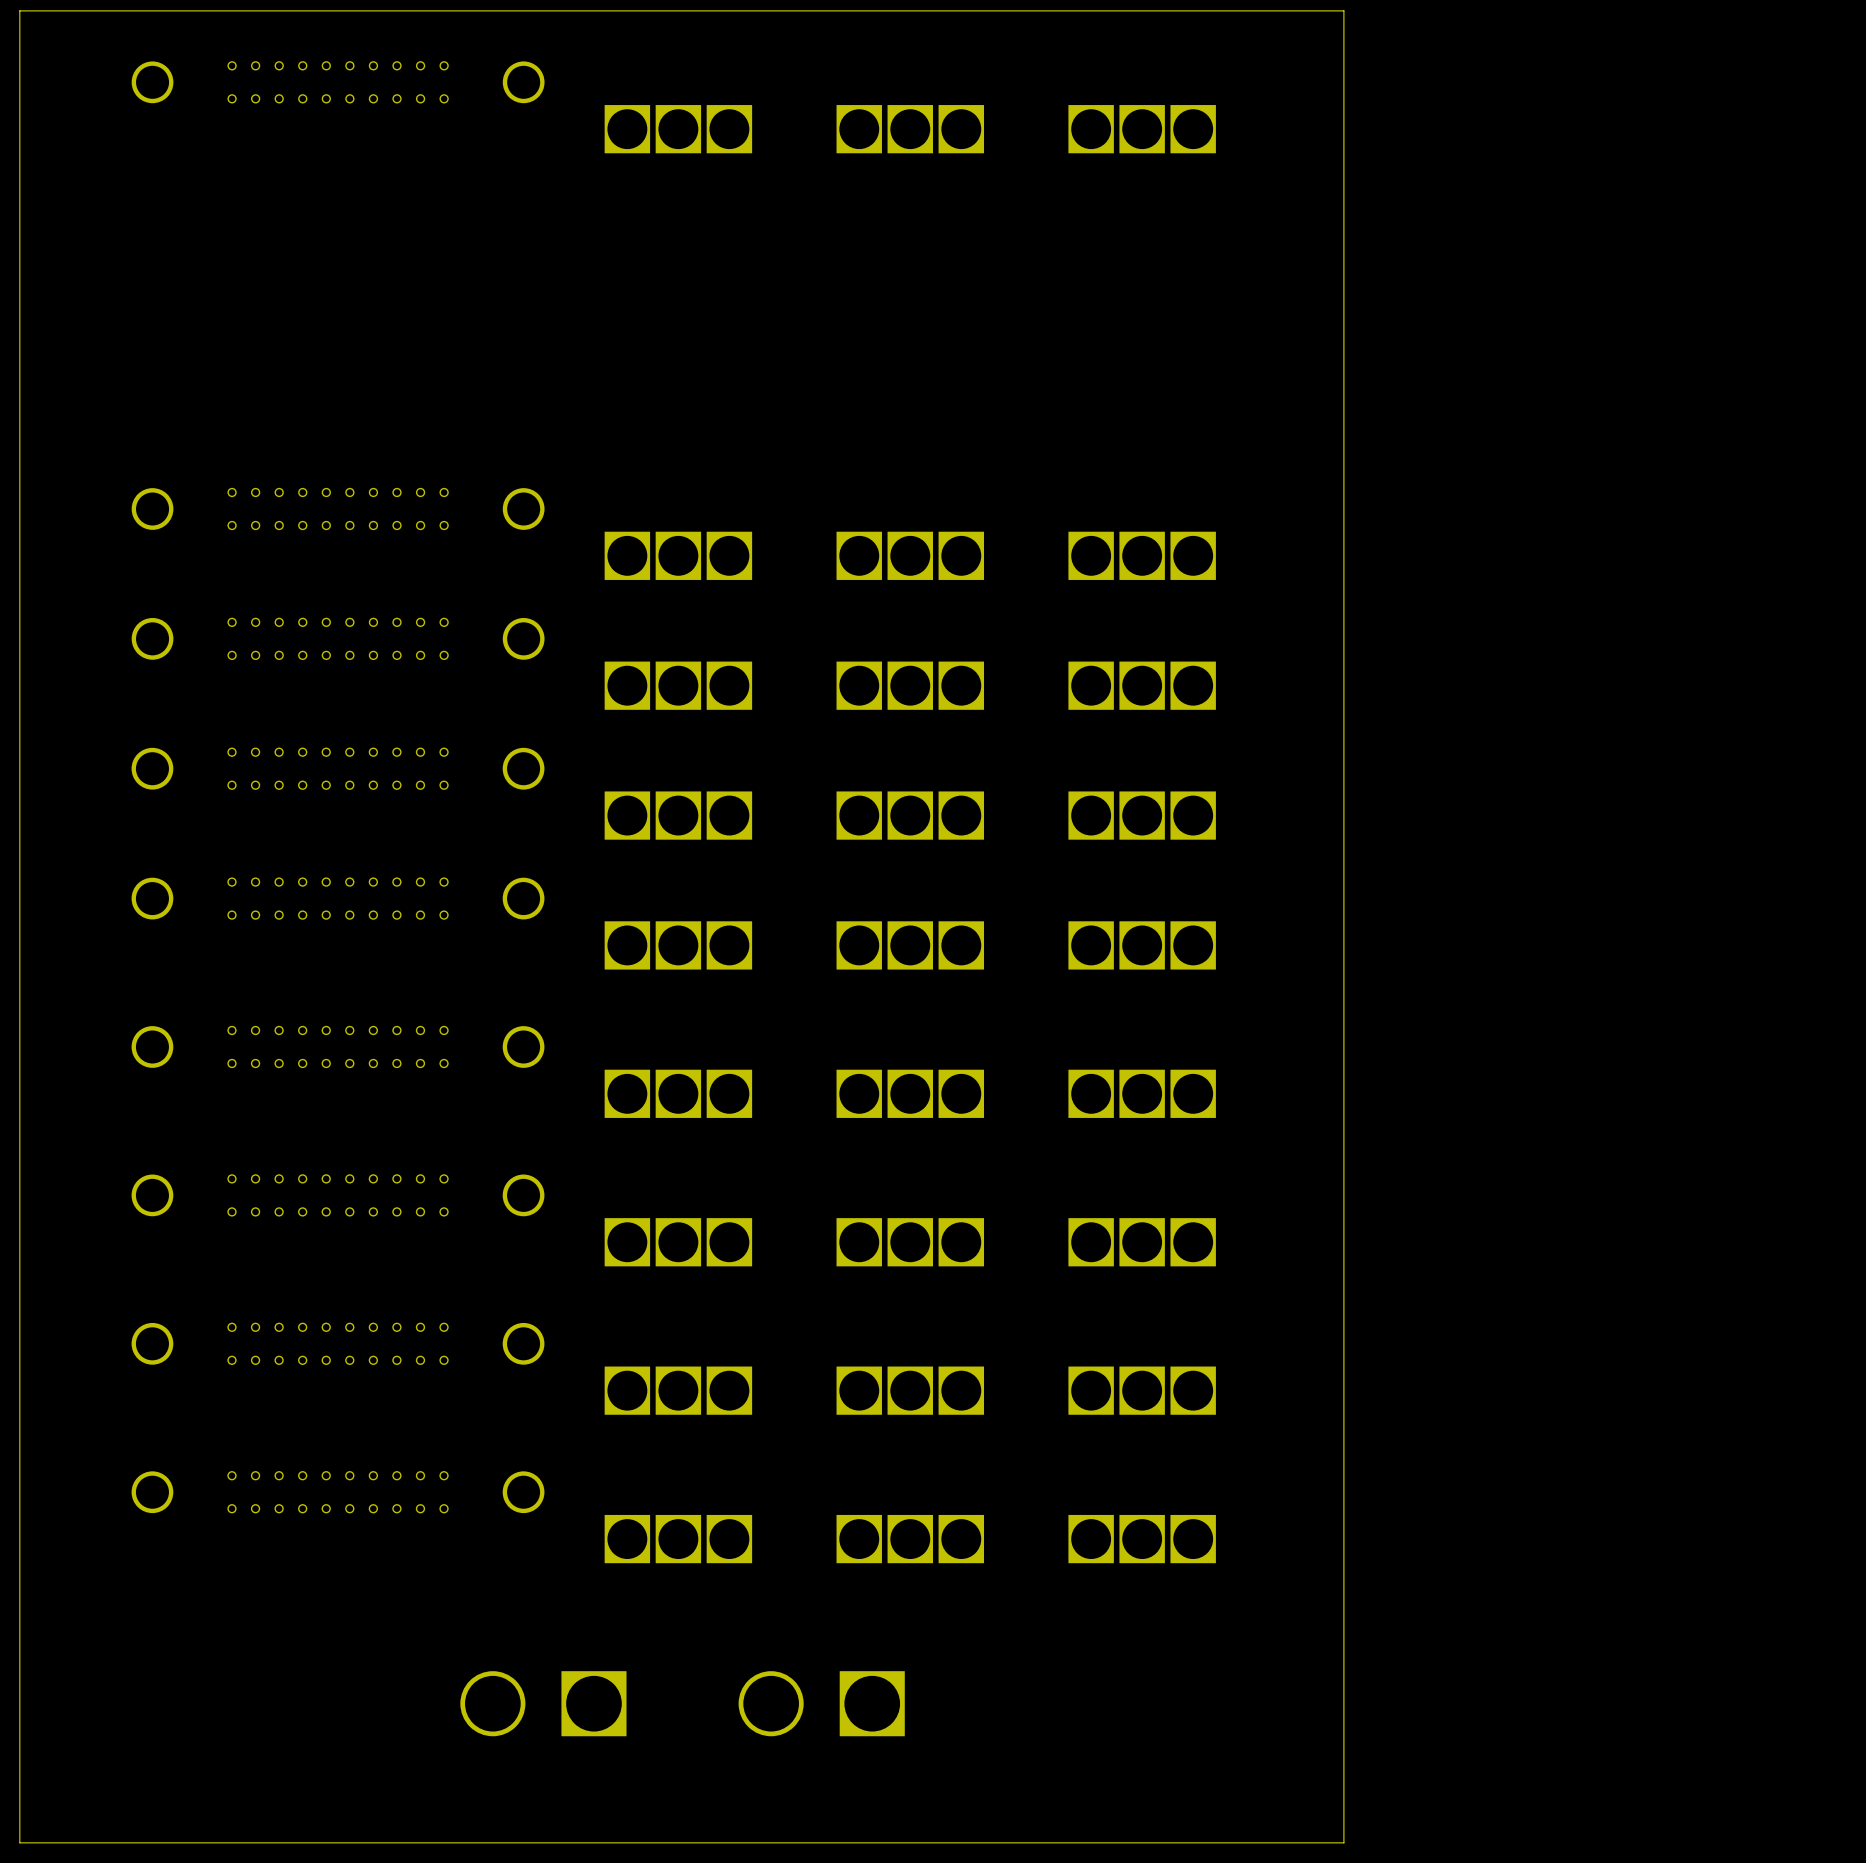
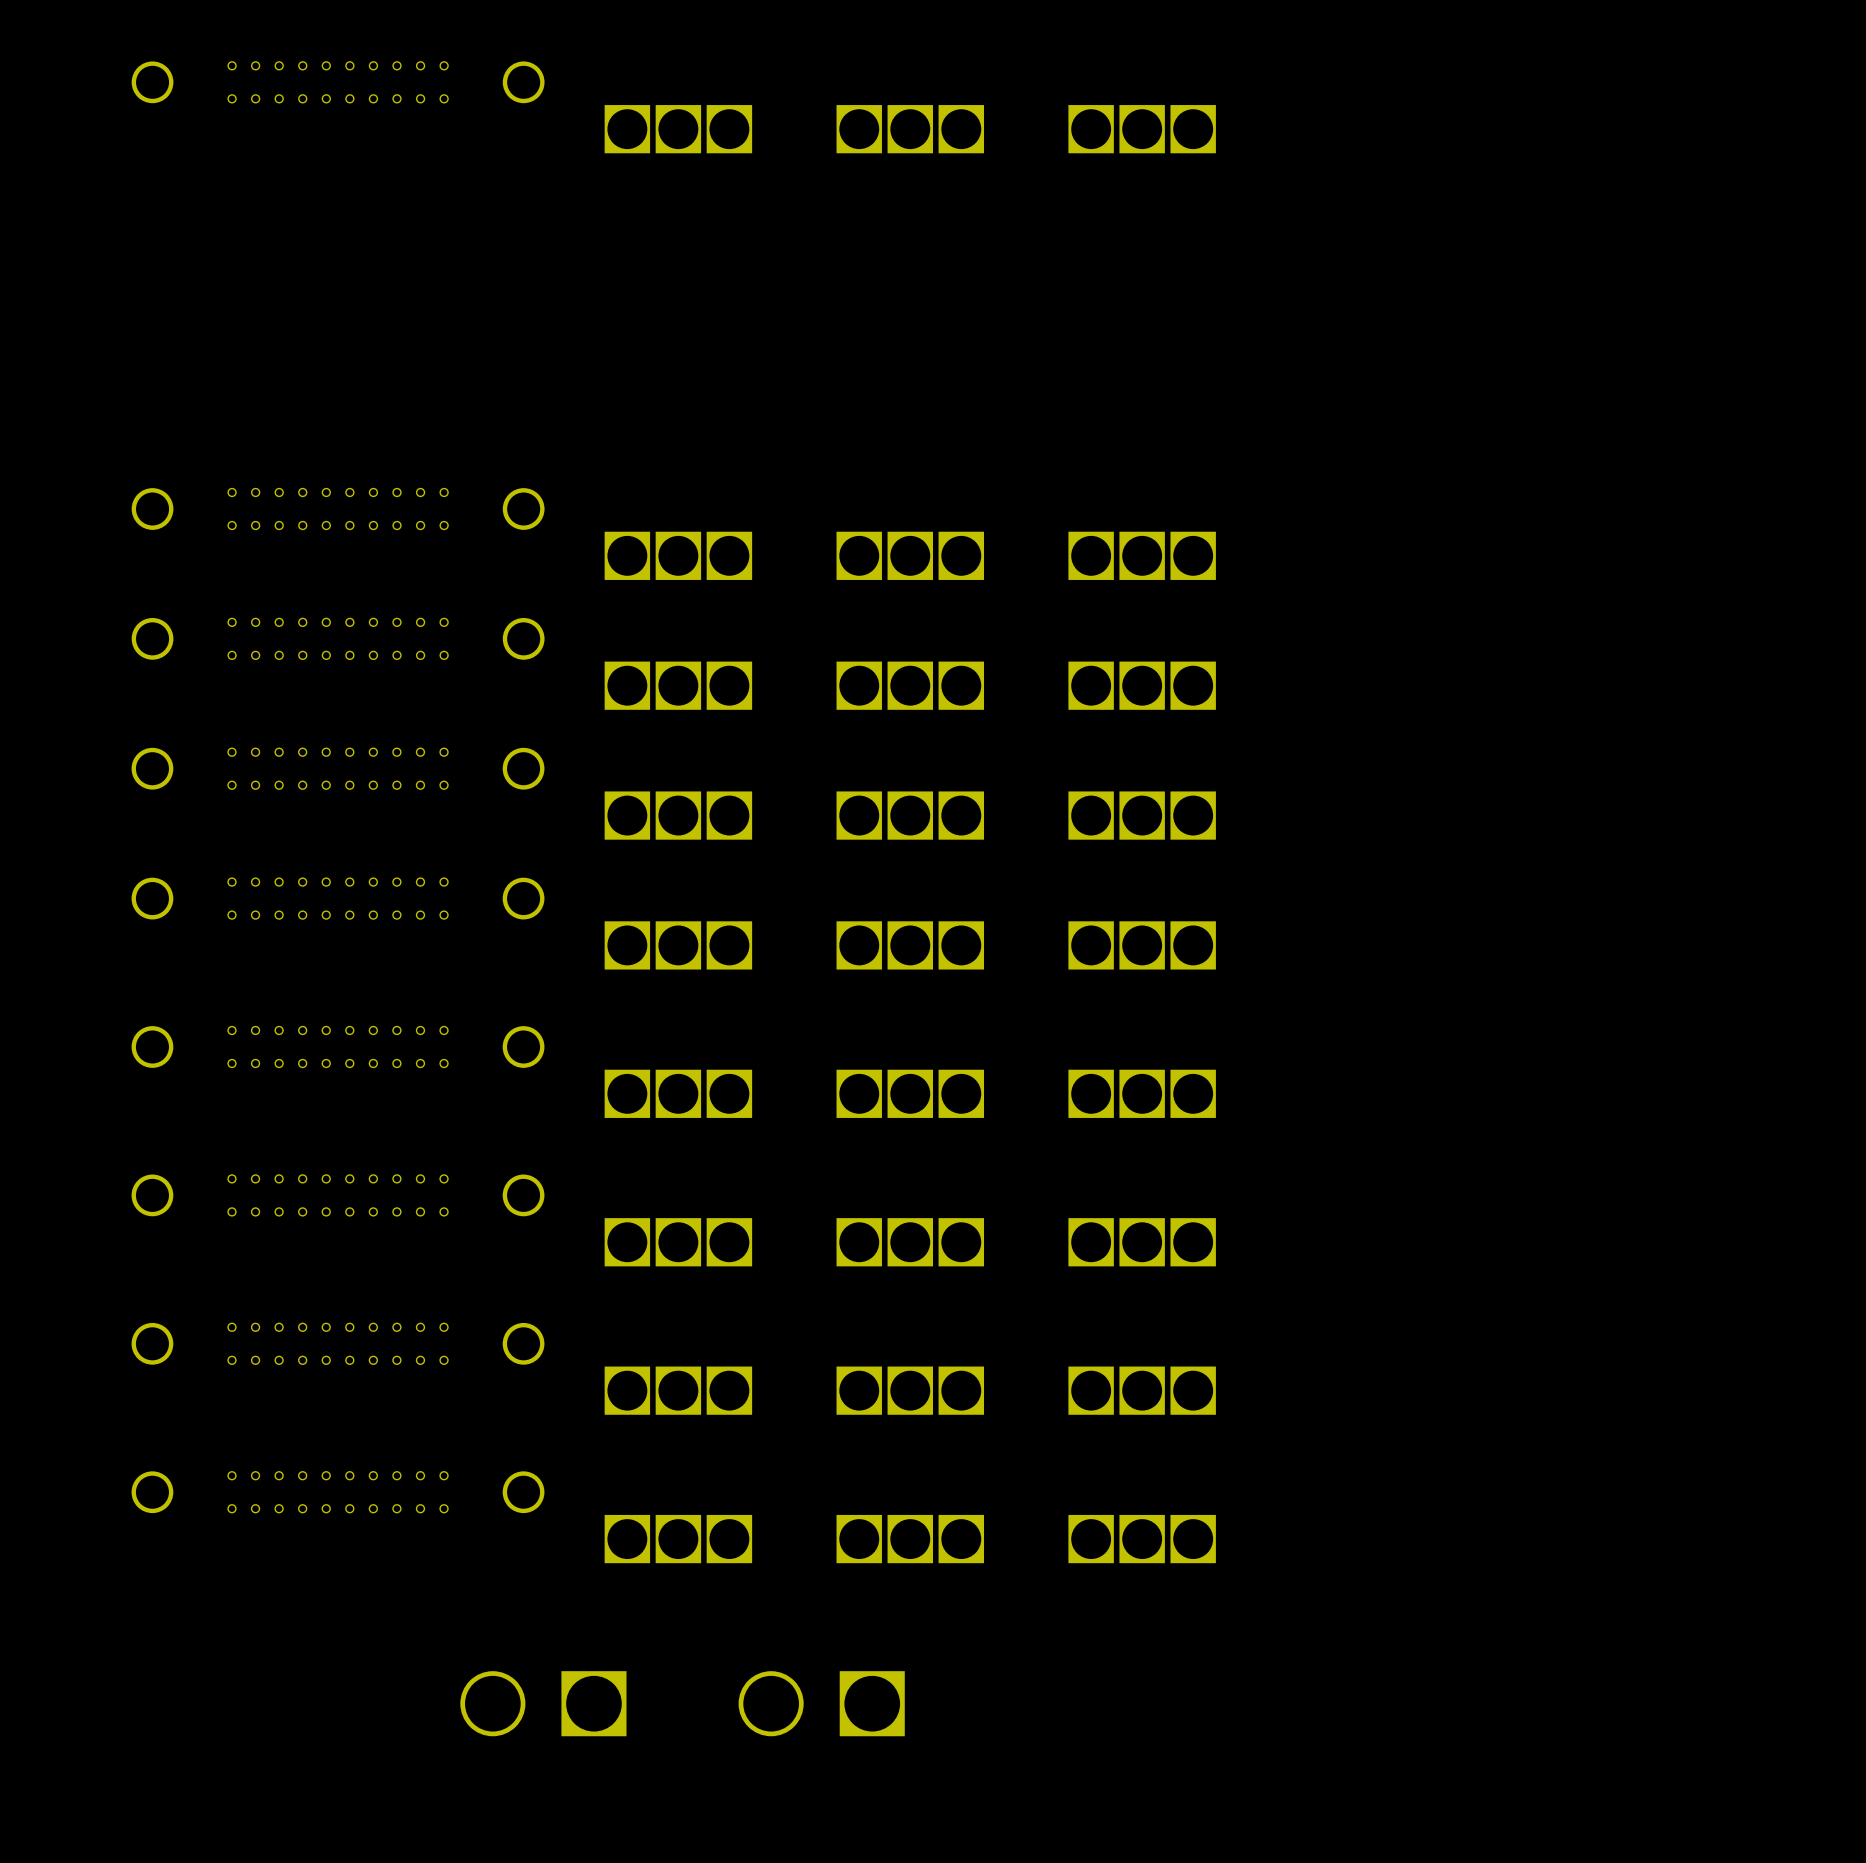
board edge: (1343, 10) (19, 10) (19, 1842) (1343, 1842) (1343, 10) -> none

